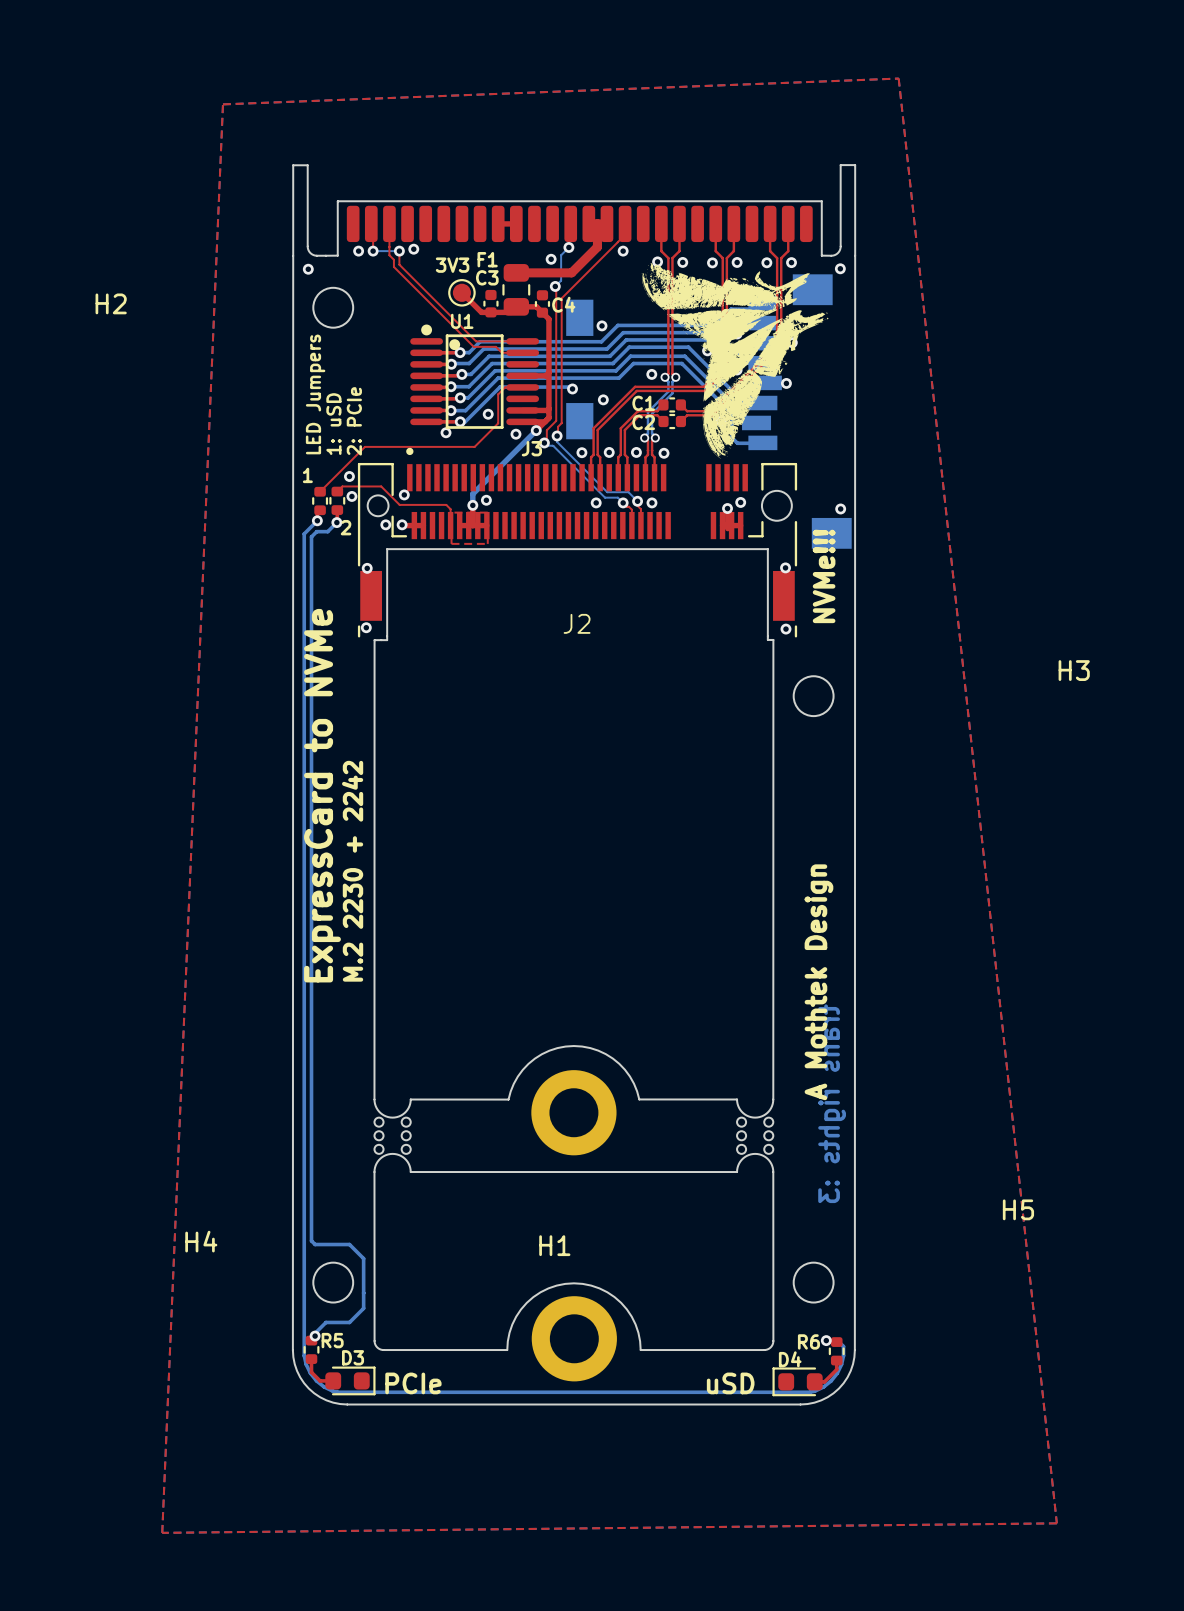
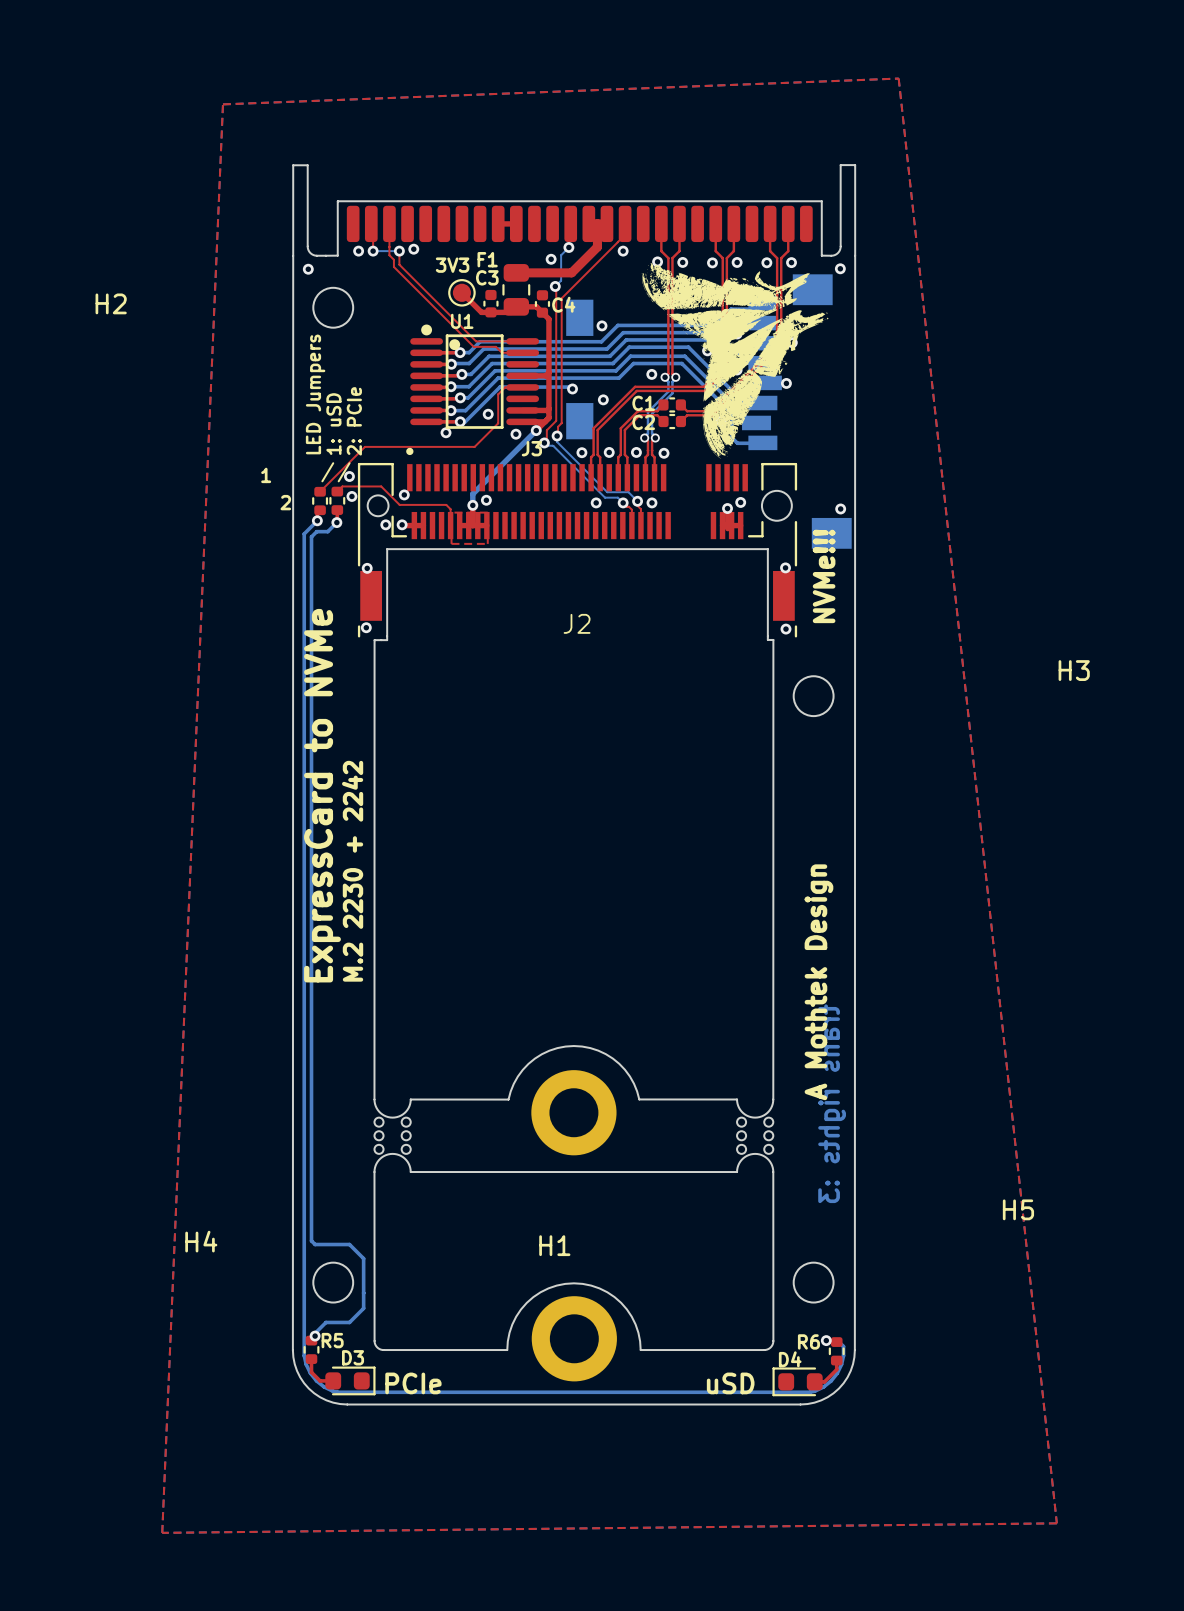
line: none -> (333, 463) (322, 481)
line: none -> (349, 463) (338, 481)
1 name position: 1 (307, 475) -> 1 (266, 475)
2 name position: 2 (346, 527) -> 2 (285, 502)

